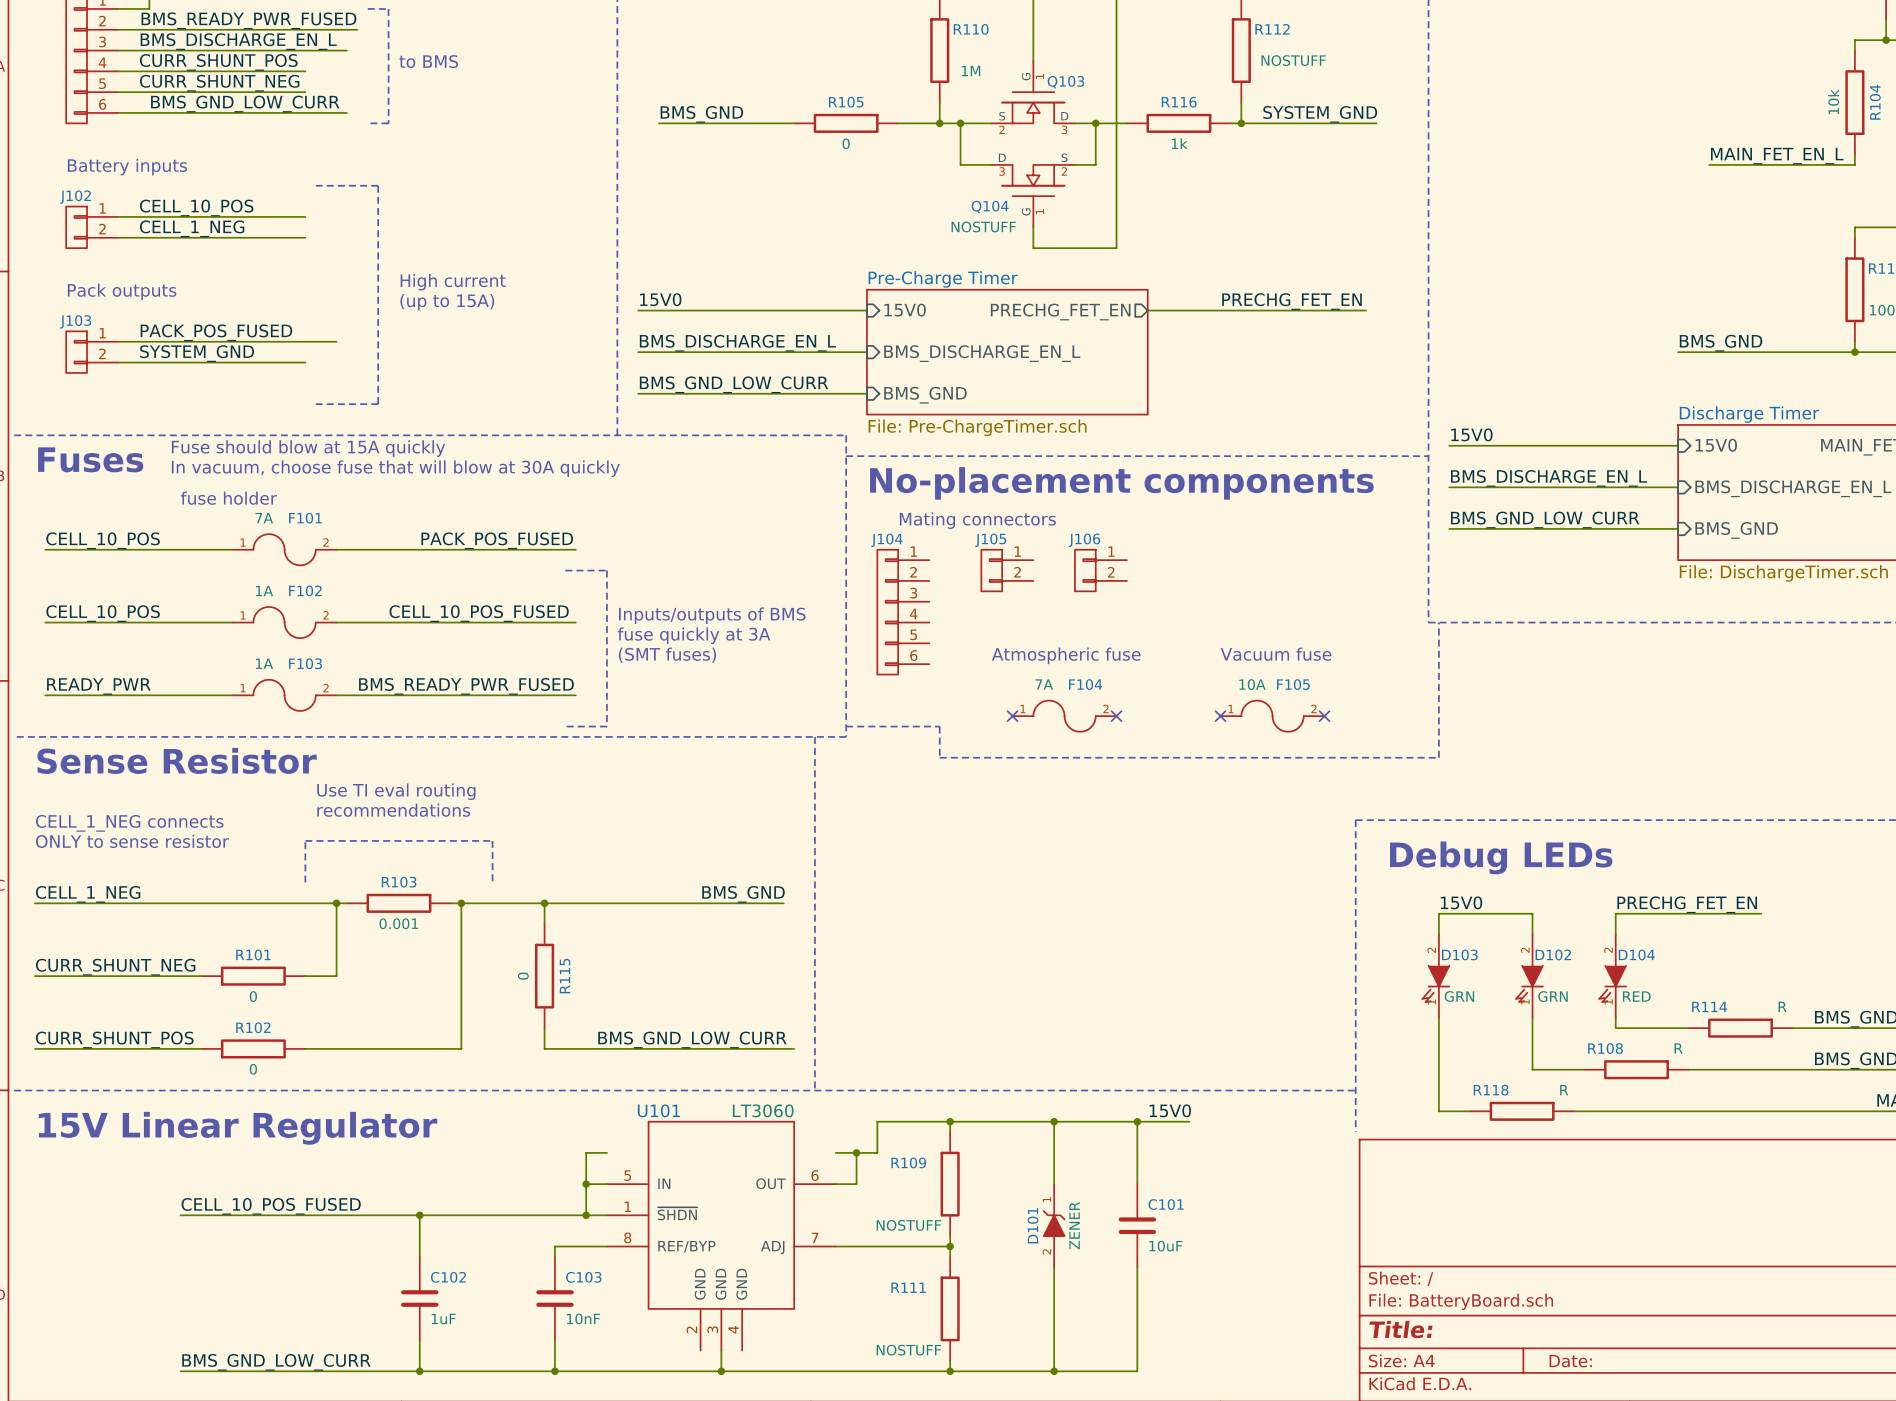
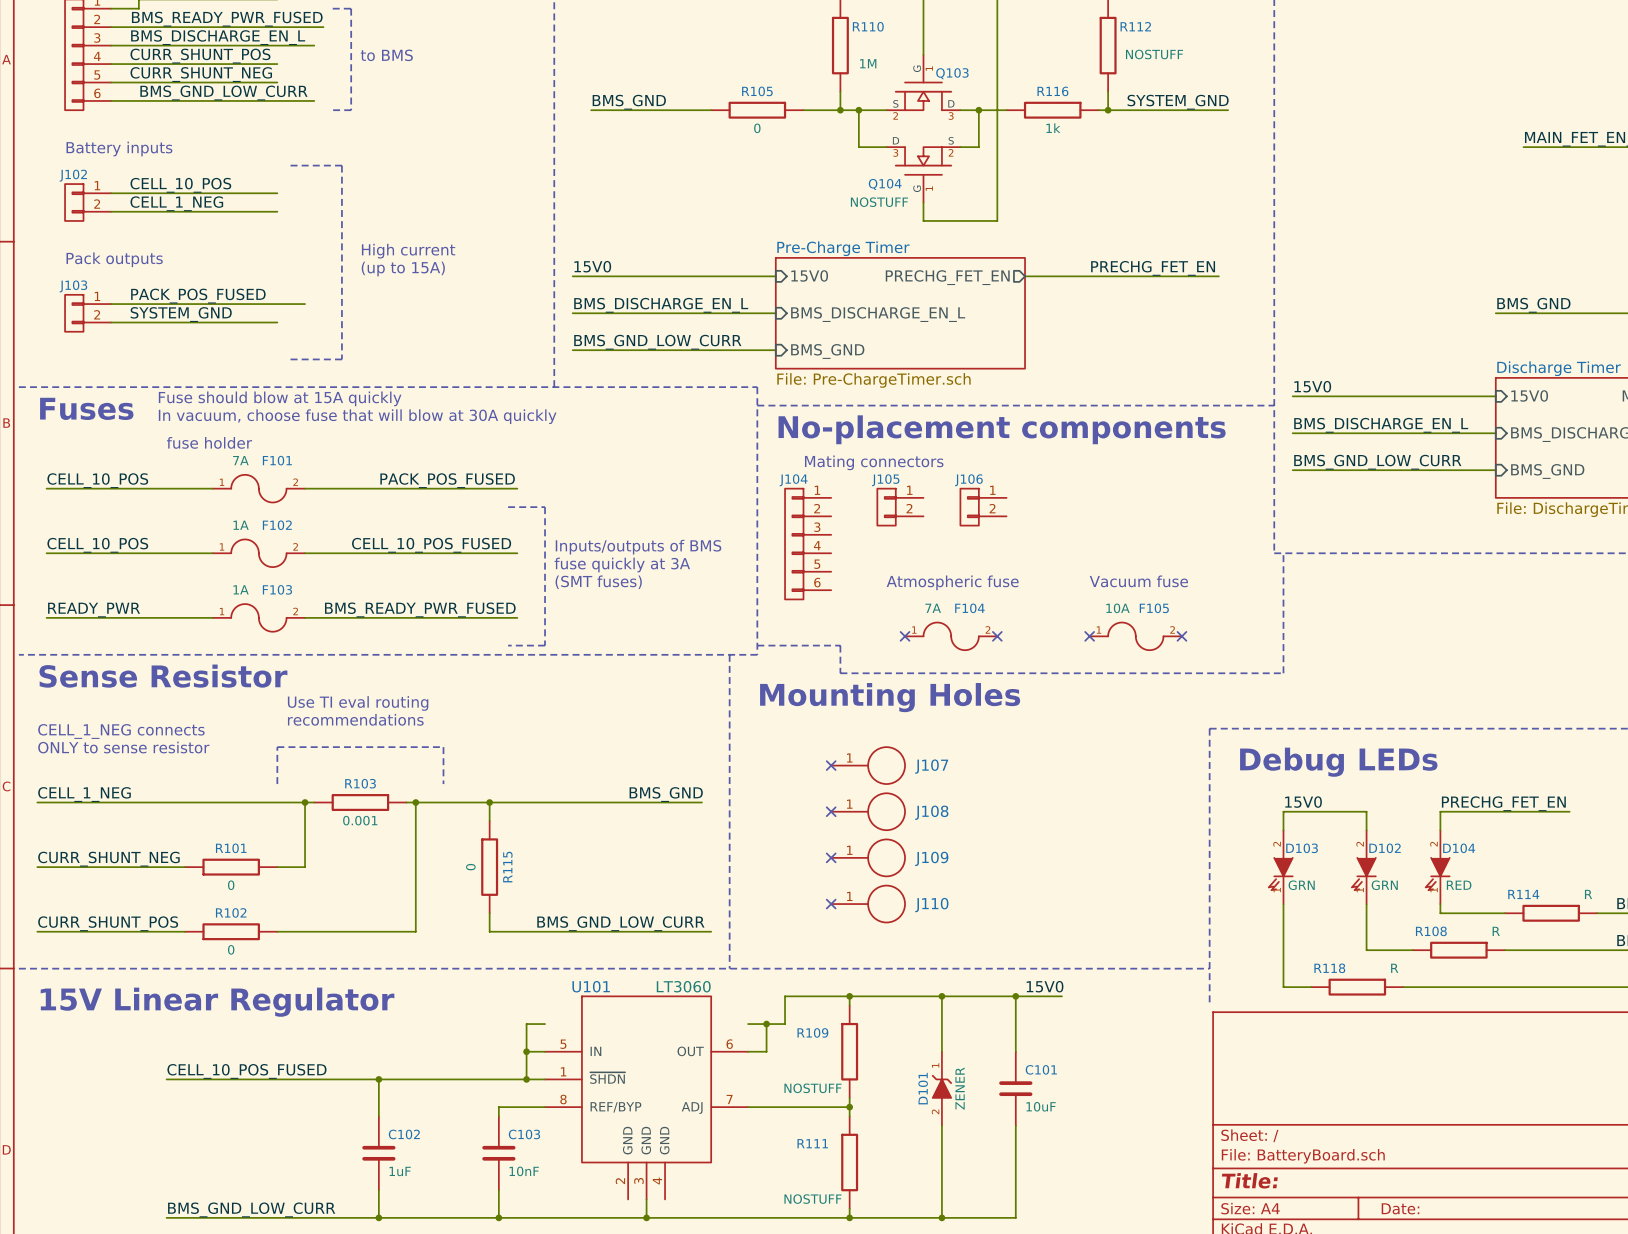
text: none -> Mounting Holes (890, 697)
no-connect mark: none -> (831, 765)
J107: none -> (868, 765)
no-connect mark: none -> (831, 811)
J108: none -> (868, 811)
no-connect mark: none -> (831, 857)
J109: none -> (868, 857)
no-connect mark: none -> (831, 904)
J110: none -> (868, 904)

